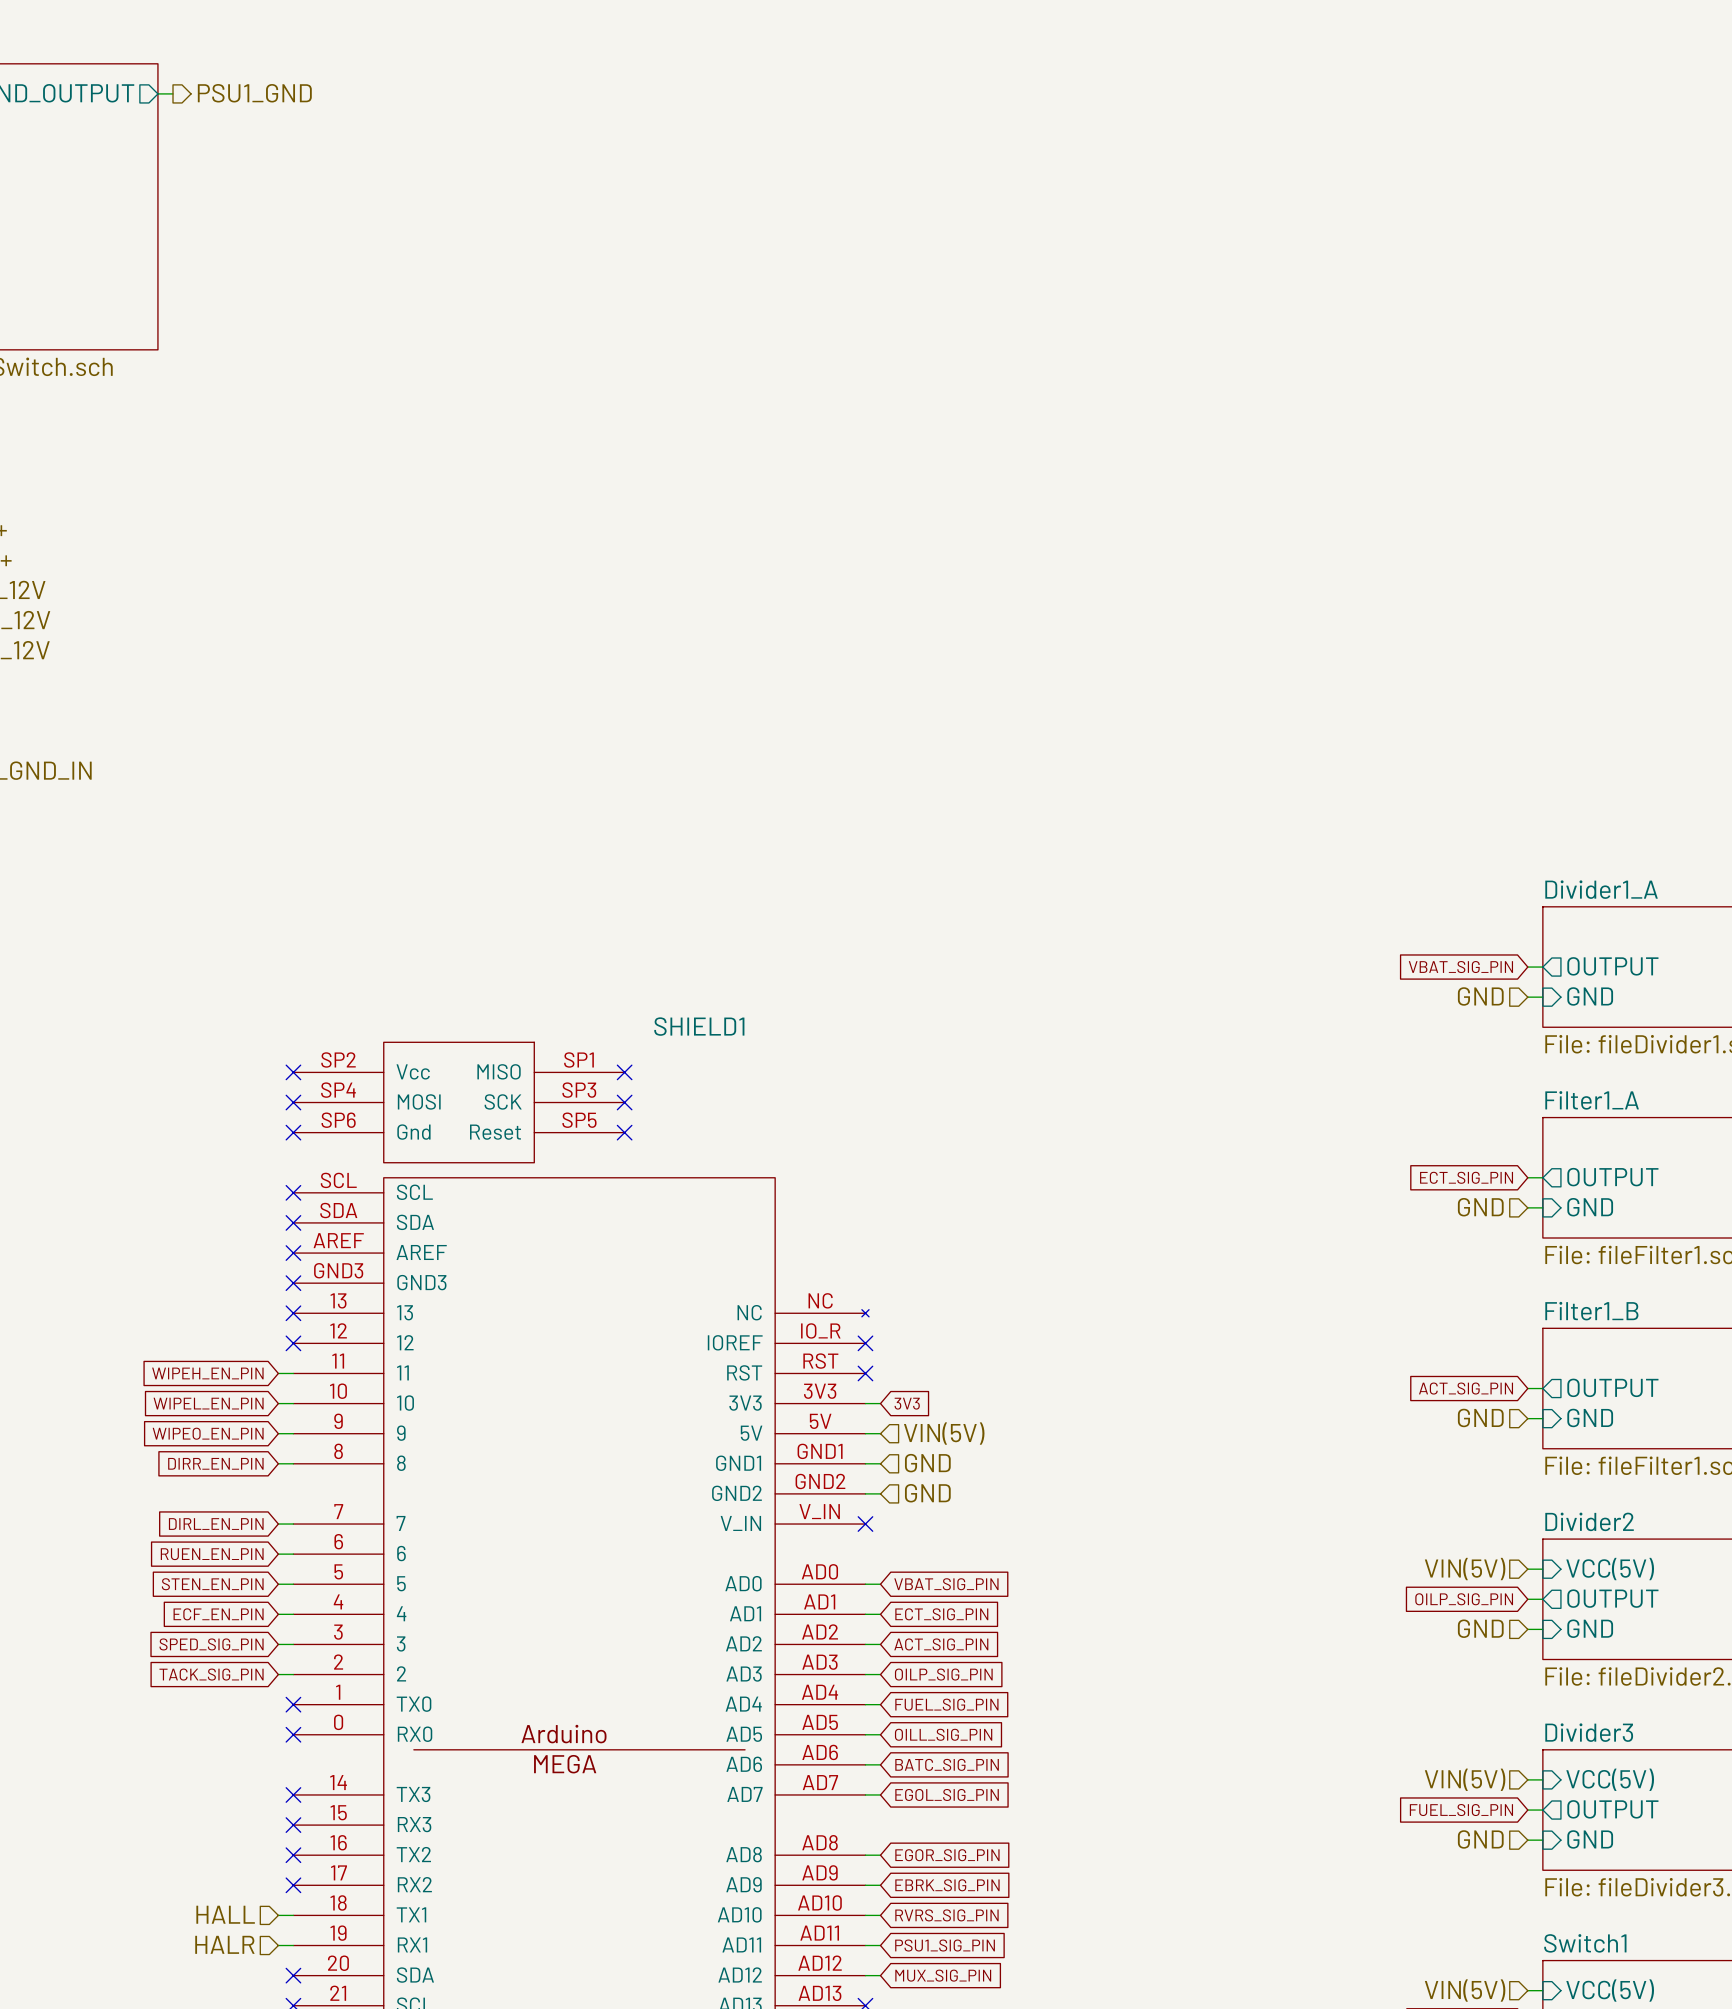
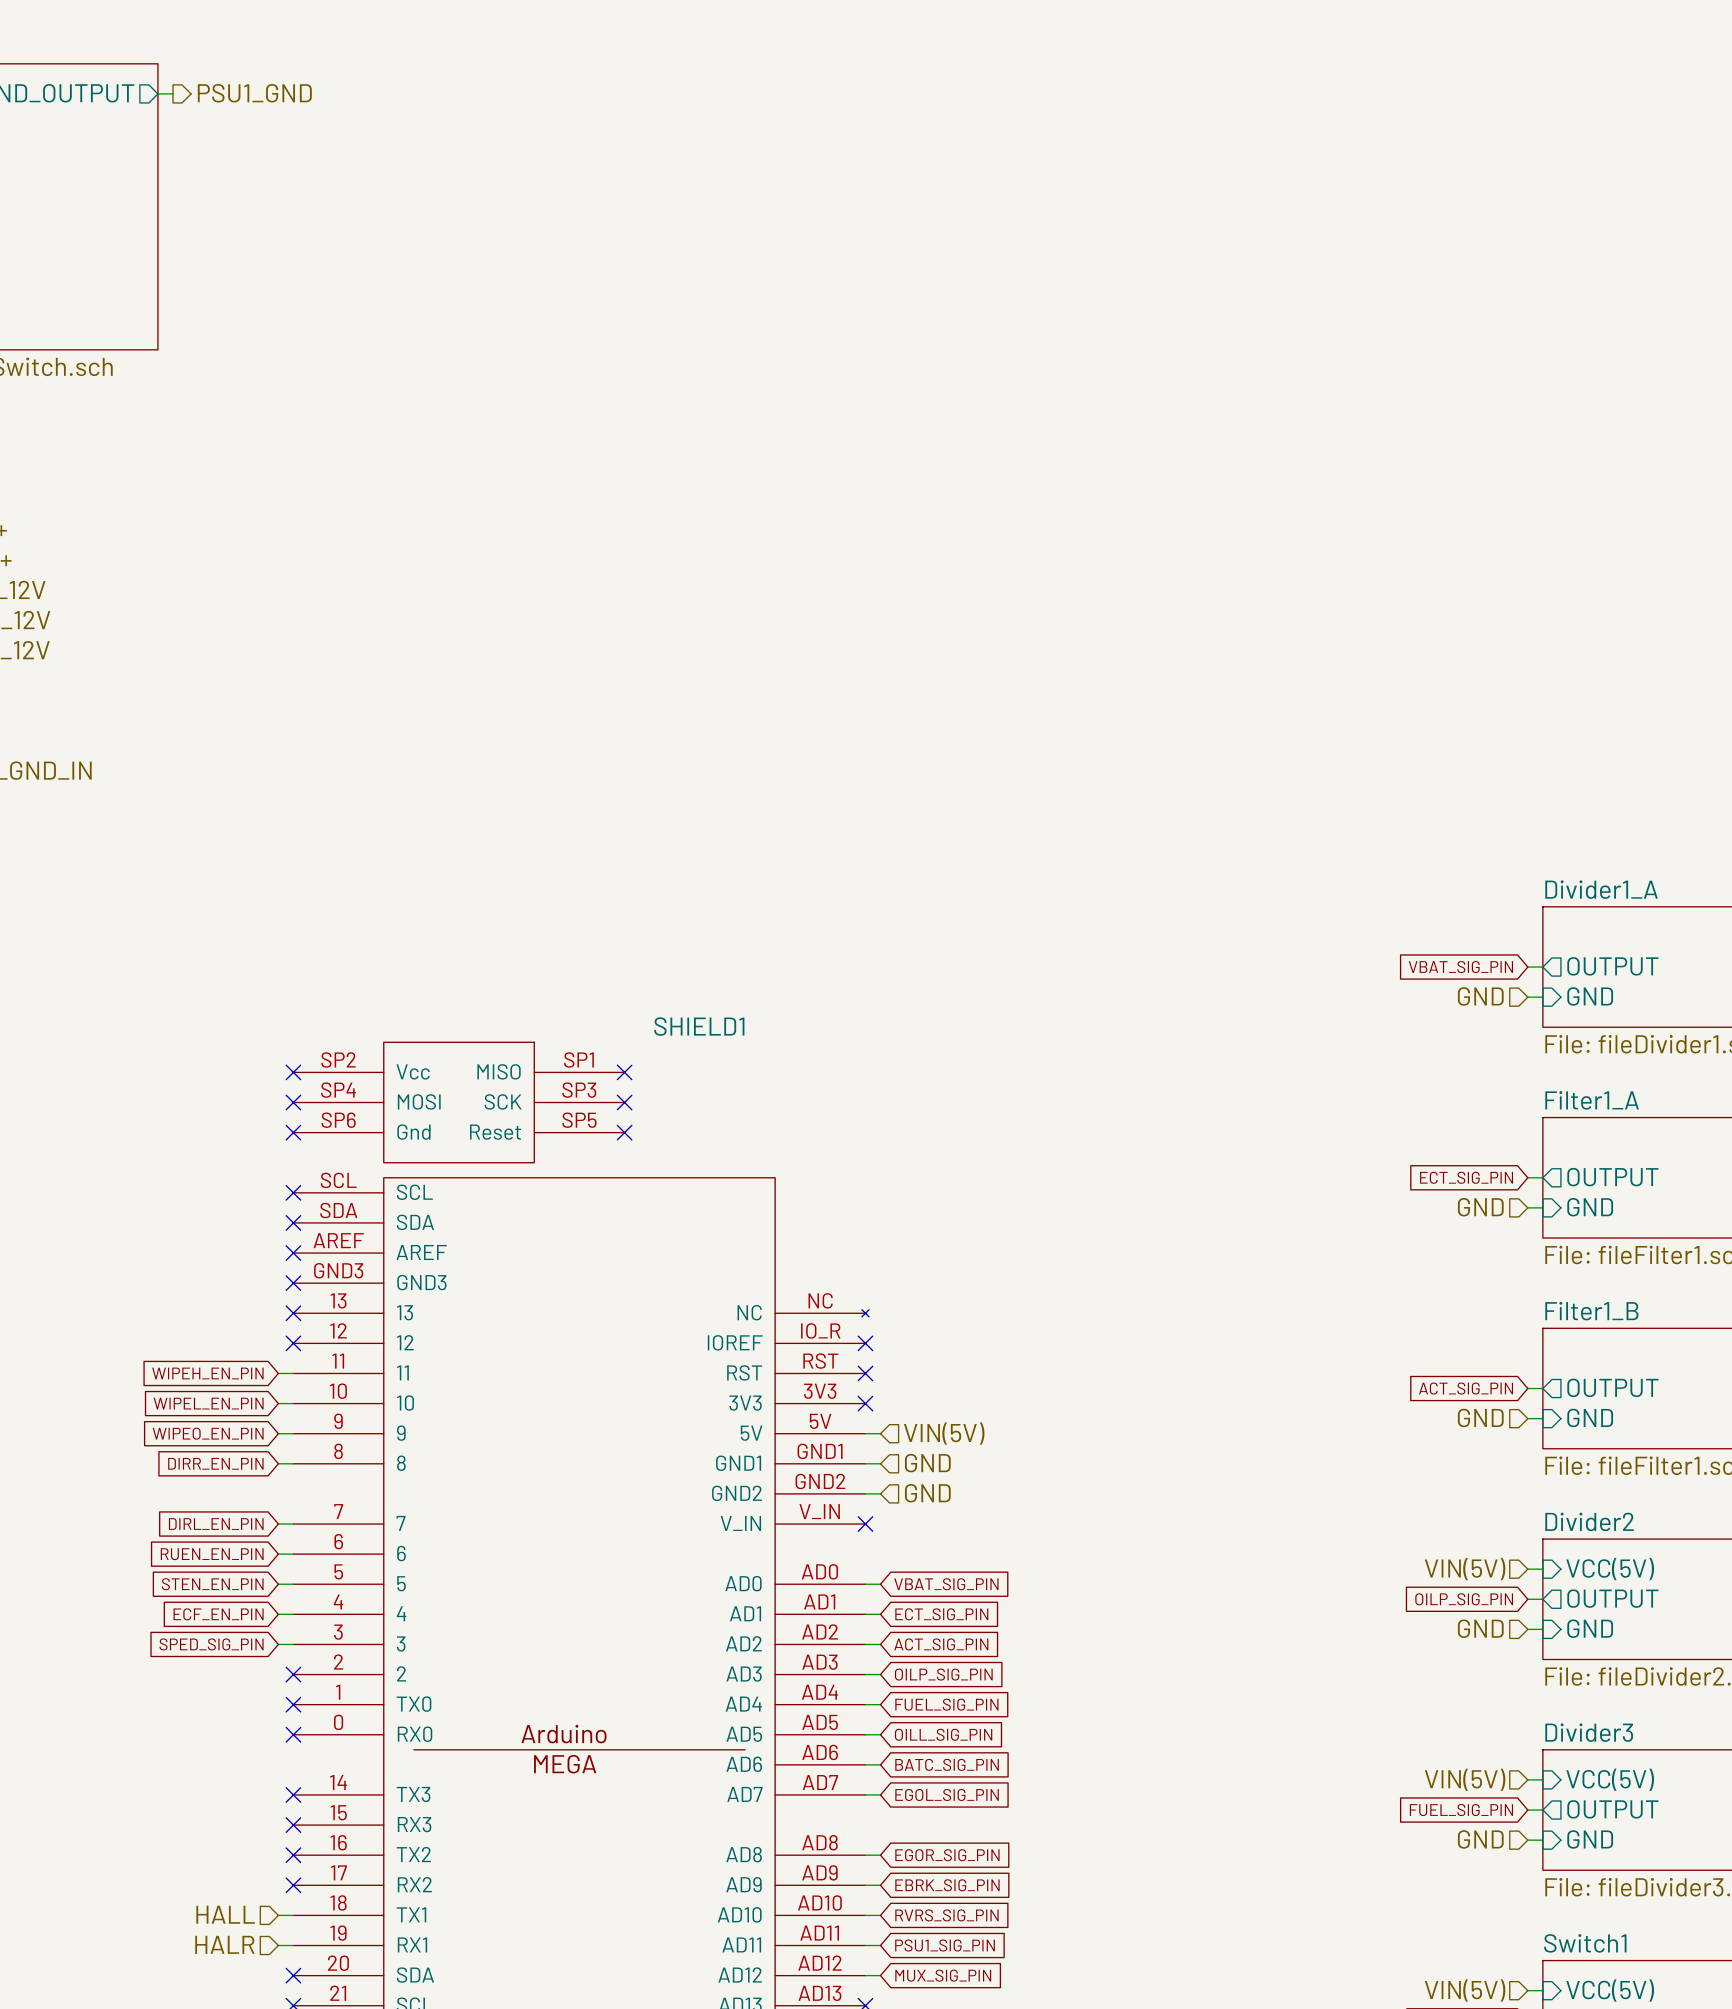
wire: (865, 1403) (880, 1403) -> none
no-connect mark: none -> (865, 1403)
global label: 3V3 (907, 1403) -> none
global label: TACK_SIG_PIN (211, 1674) -> none
wire: (278, 1674) (293, 1674) -> none
no-connect mark: none -> (293, 1674)

